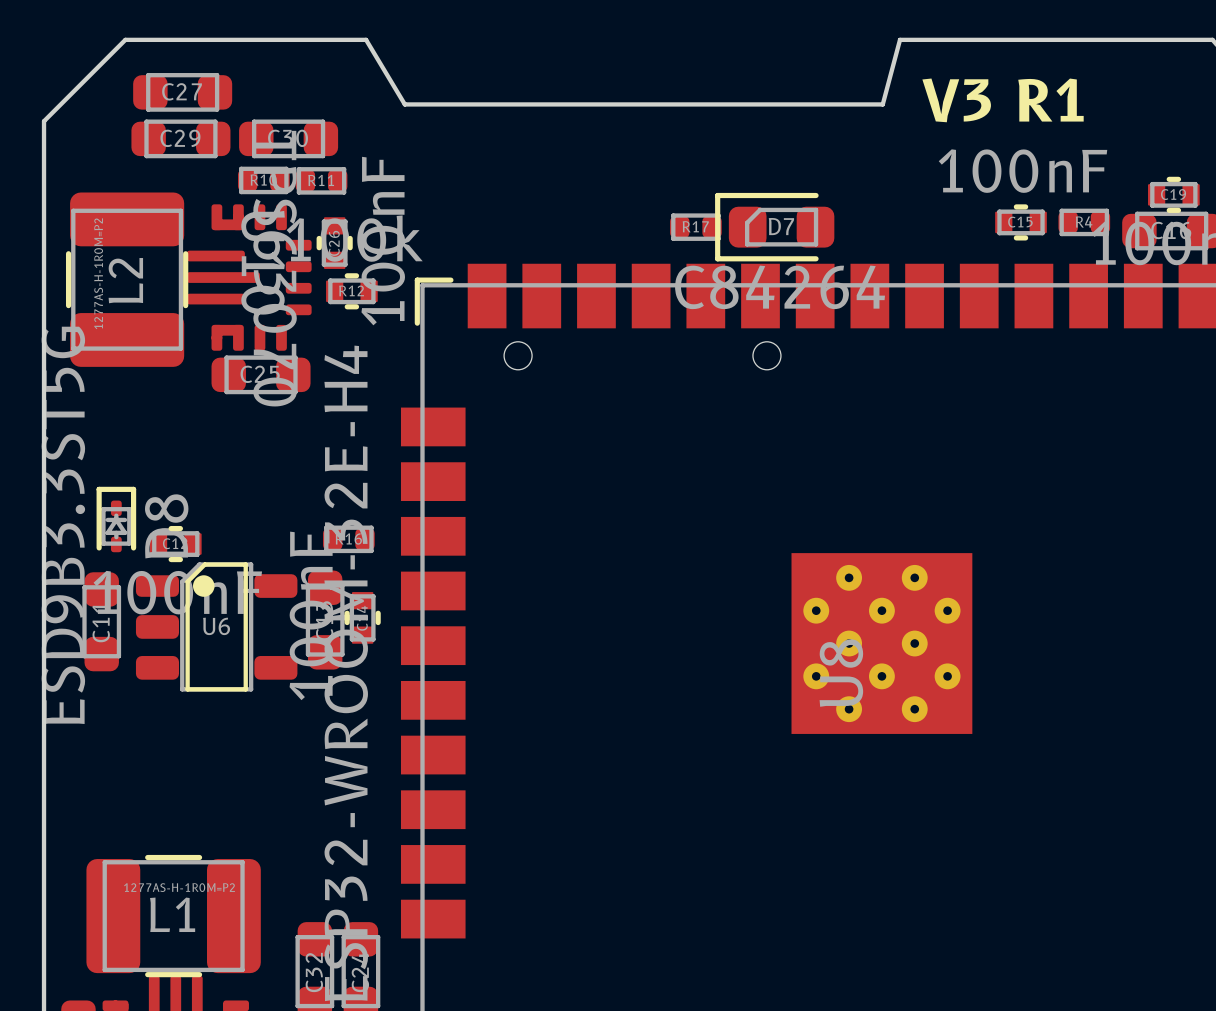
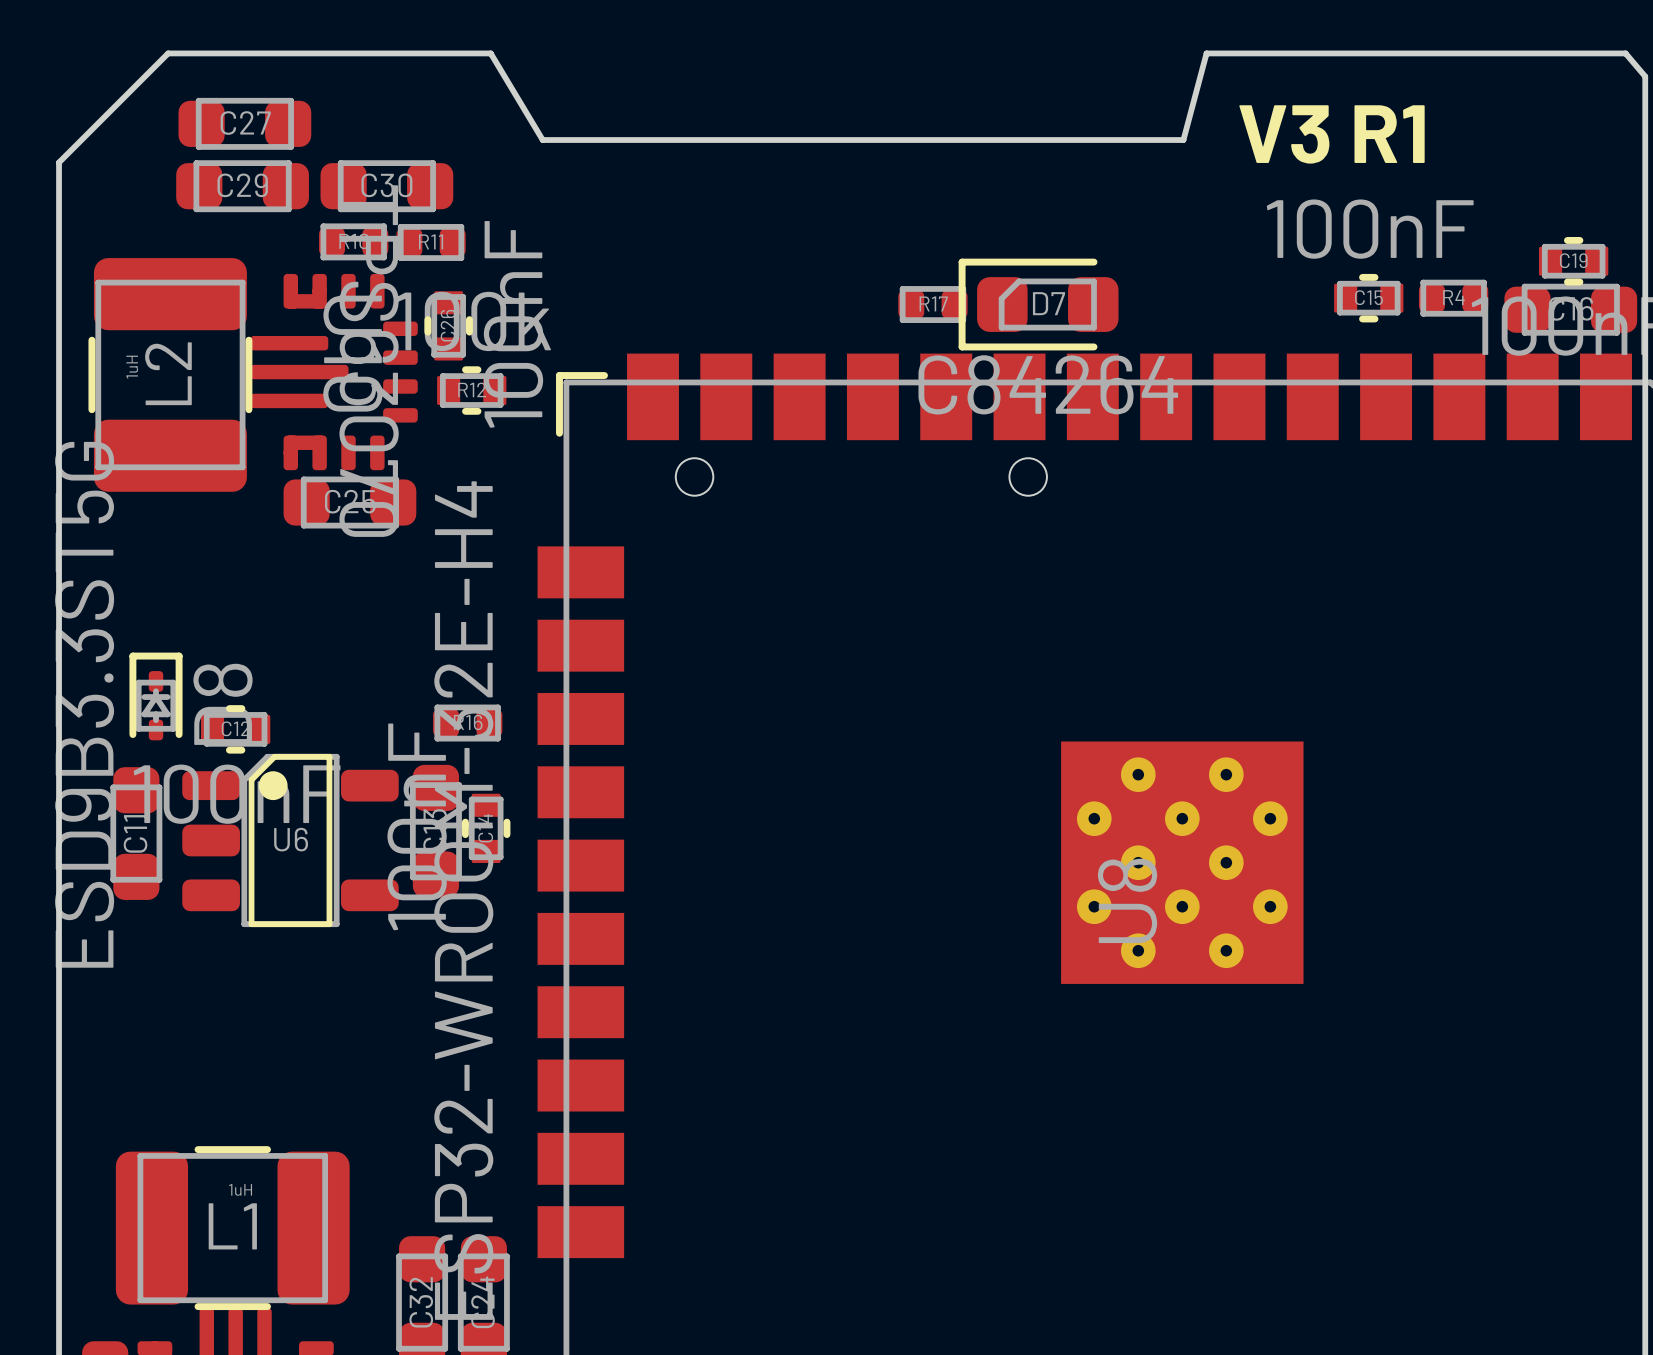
L2 value: 1277AS-H-1R0M=P2 (98, 273) -> 1uH (132, 367)
L1 value: 1277AS-H-1R0M=P2 (179, 887) -> 1uH (240, 1189)

